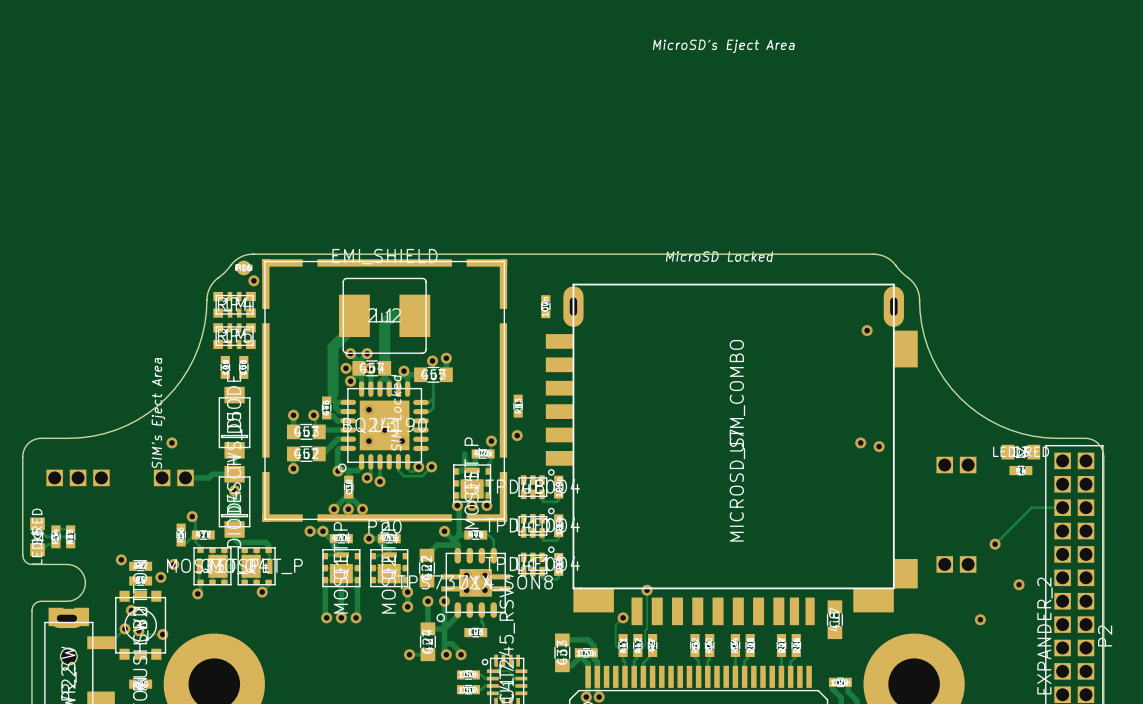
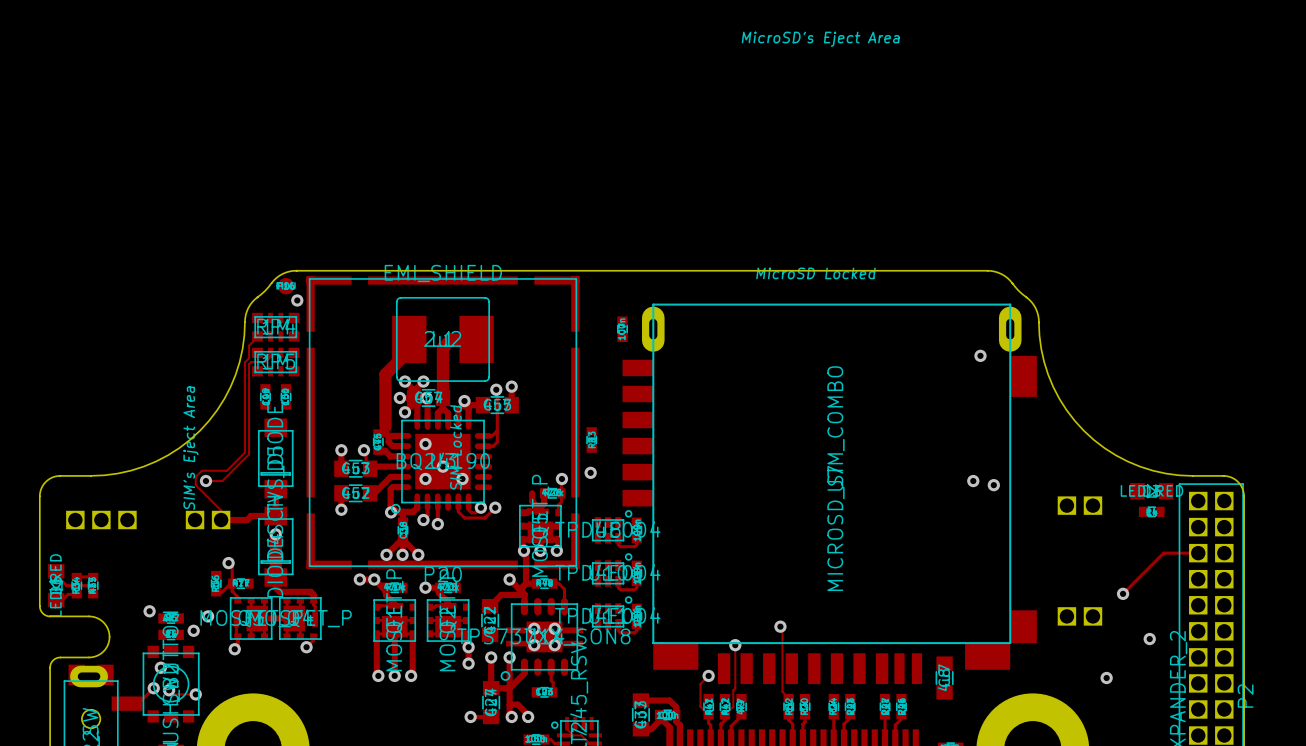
track: none -> (257, 336) (249, 345) (249, 358) (244, 362) (244, 452) (226, 470) (201, 470) (195, 476) (195, 485) (221, 510) (221, 520)
track: none -> (270, 352) (270, 356) (265, 362) (251, 362) (249, 364) (249, 454) (222, 481) (205, 481)
track: none -> (780, 626) (782, 628) (782, 691) (788, 698)
via: none -> (780, 626)

